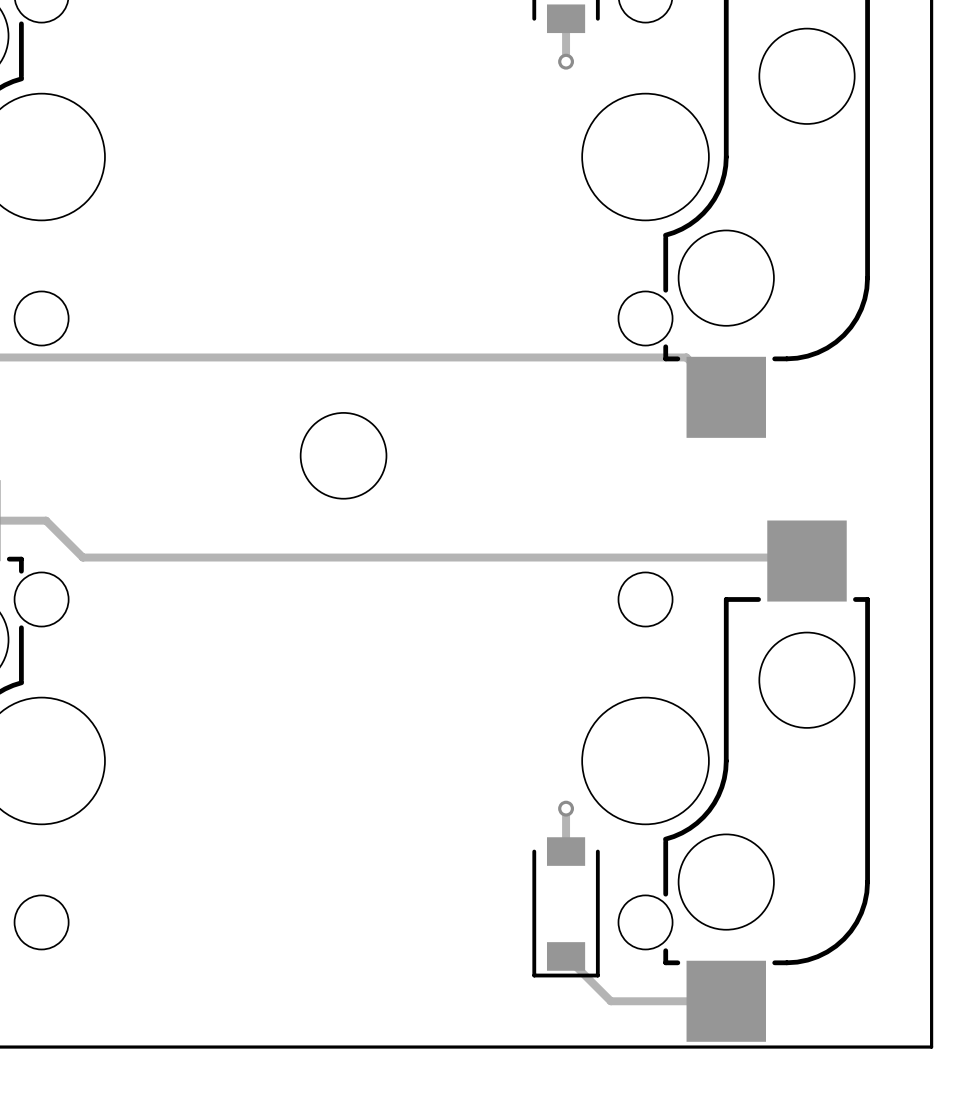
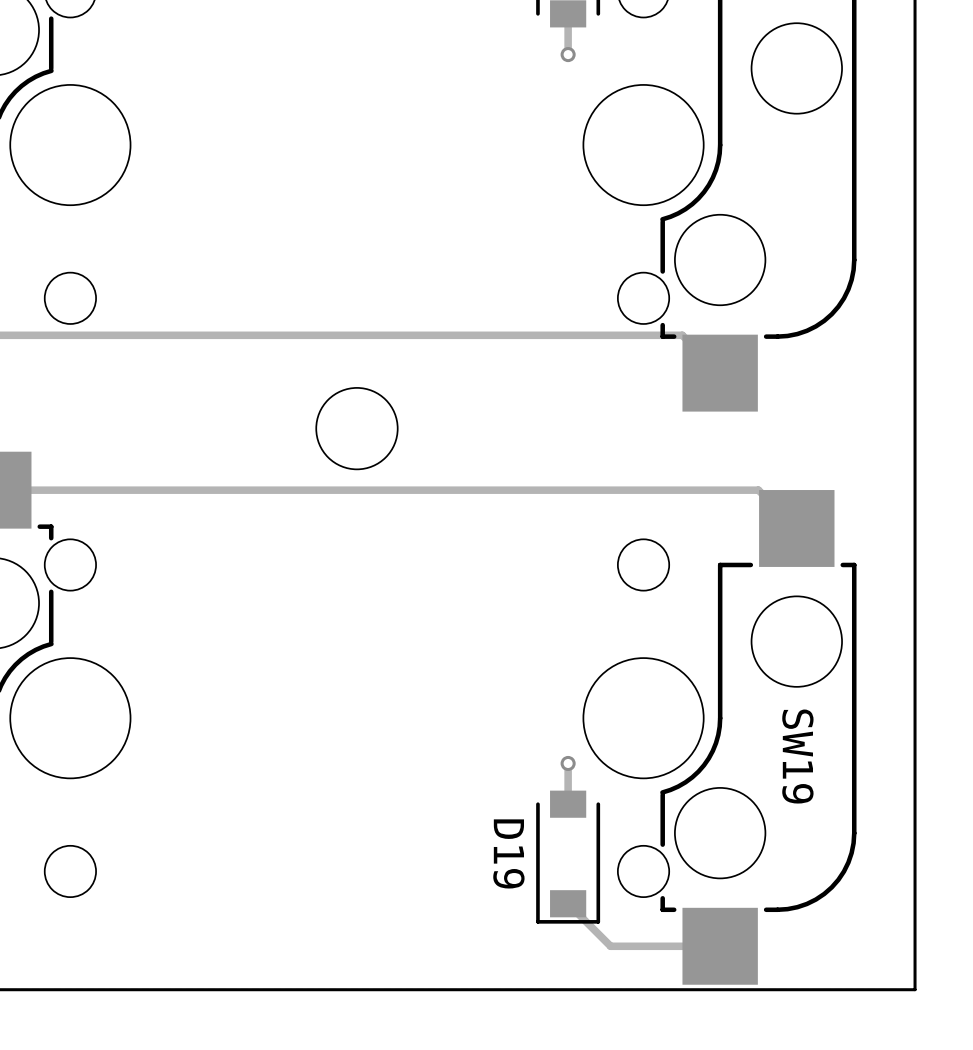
track: (46, 520) (82, 557) (803, 557) -> (74, 490) (758, 490) (793, 525)
SW19 name: none -> SW19 (797, 756)
D19 name: none -> D19 (508, 853)

